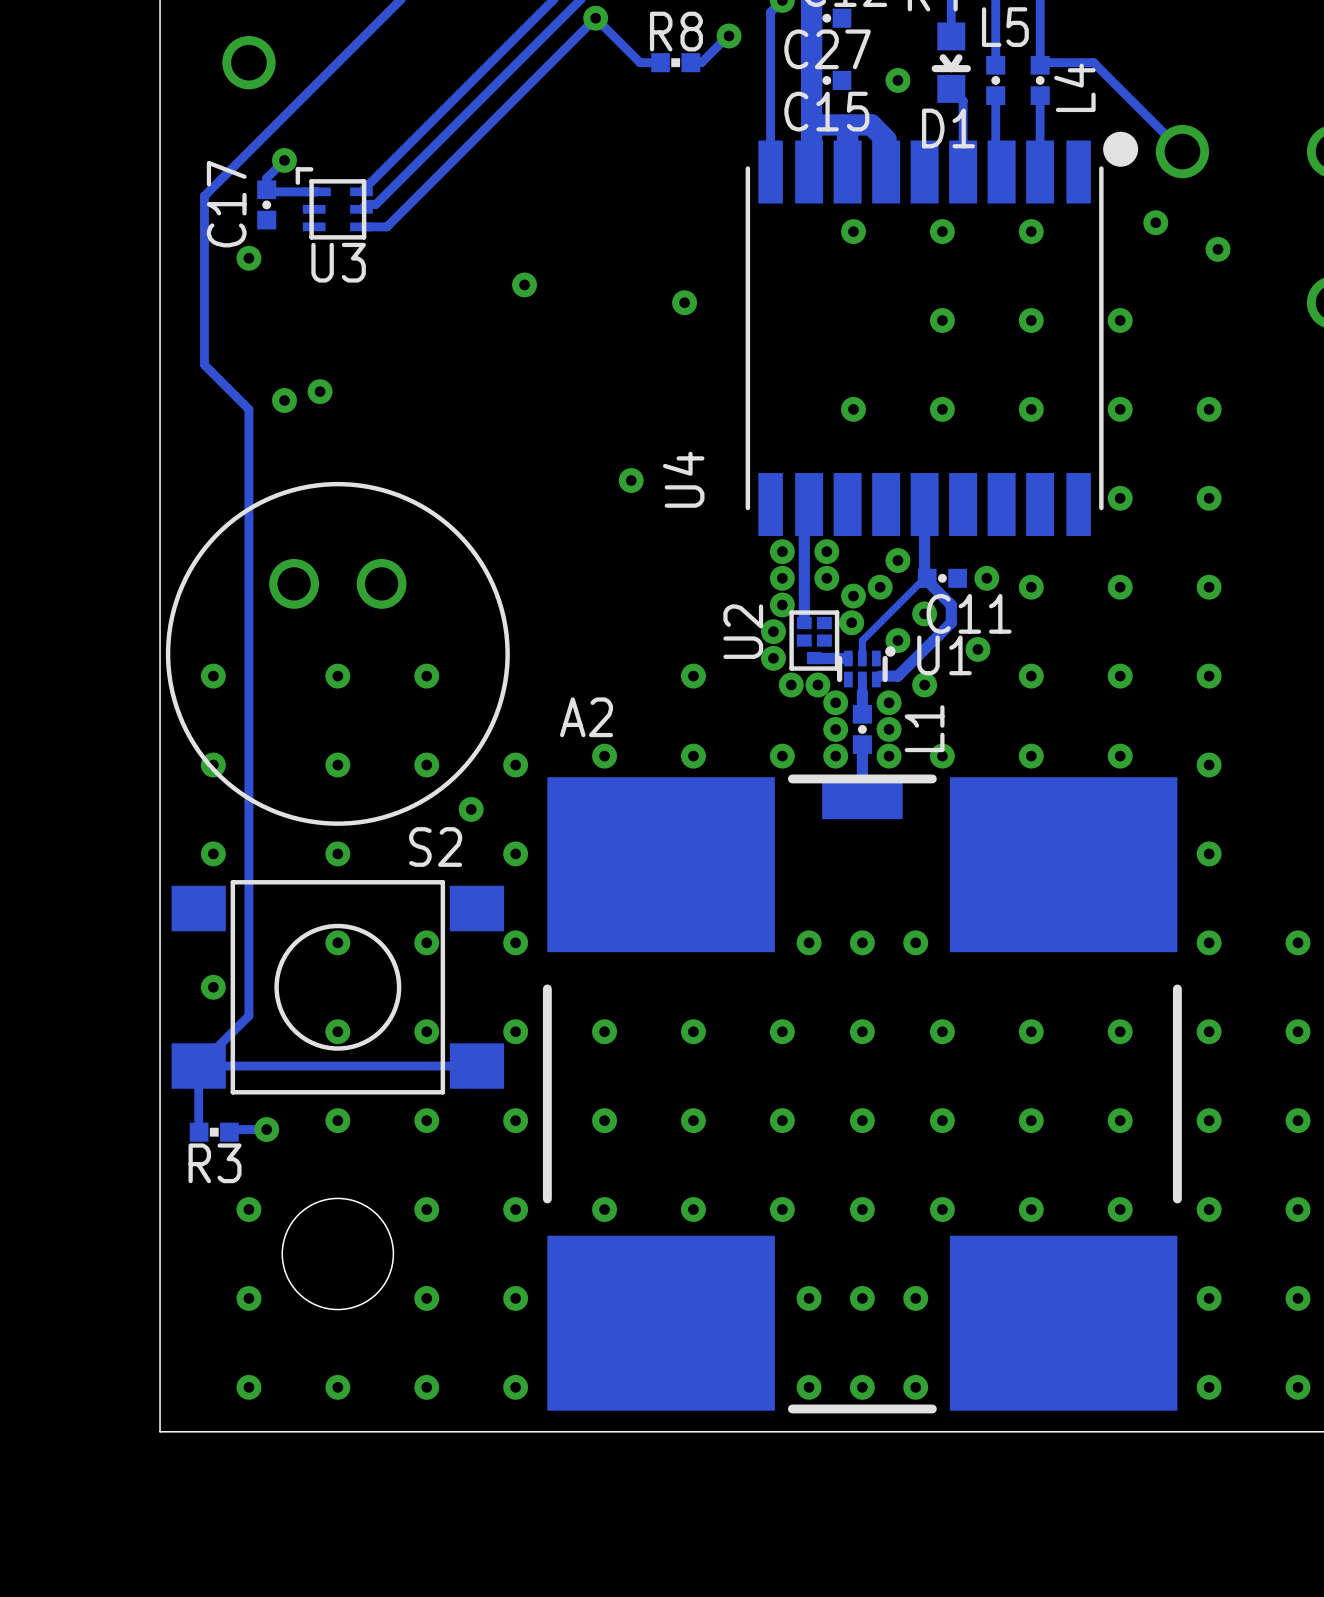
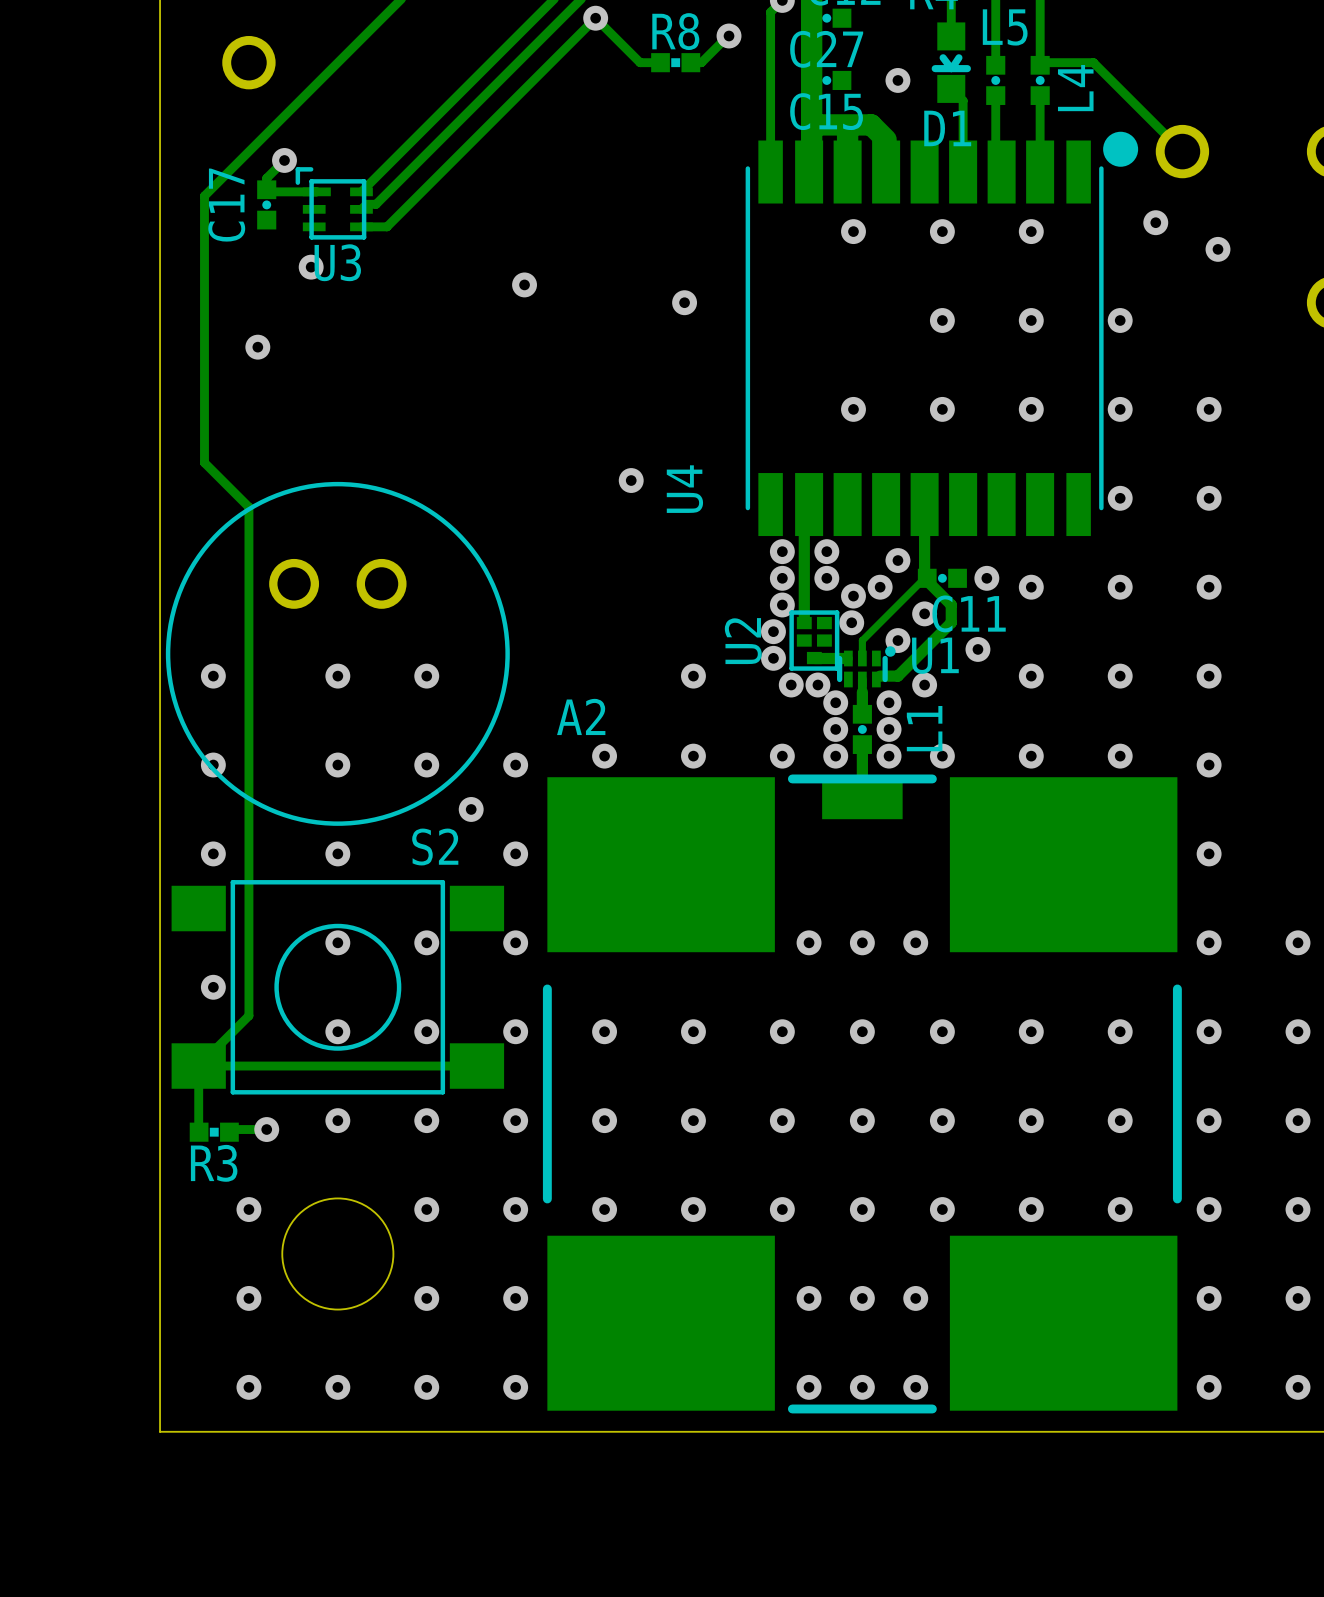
via: (248, 258) -> none
via: none -> (311, 267)
via: none -> (257, 347)
track: (204, 364) (248, 409) (248, 507) -> (204, 364) (204, 462) (248, 507)
via: (320, 391) -> none
via: (284, 400) -> none

